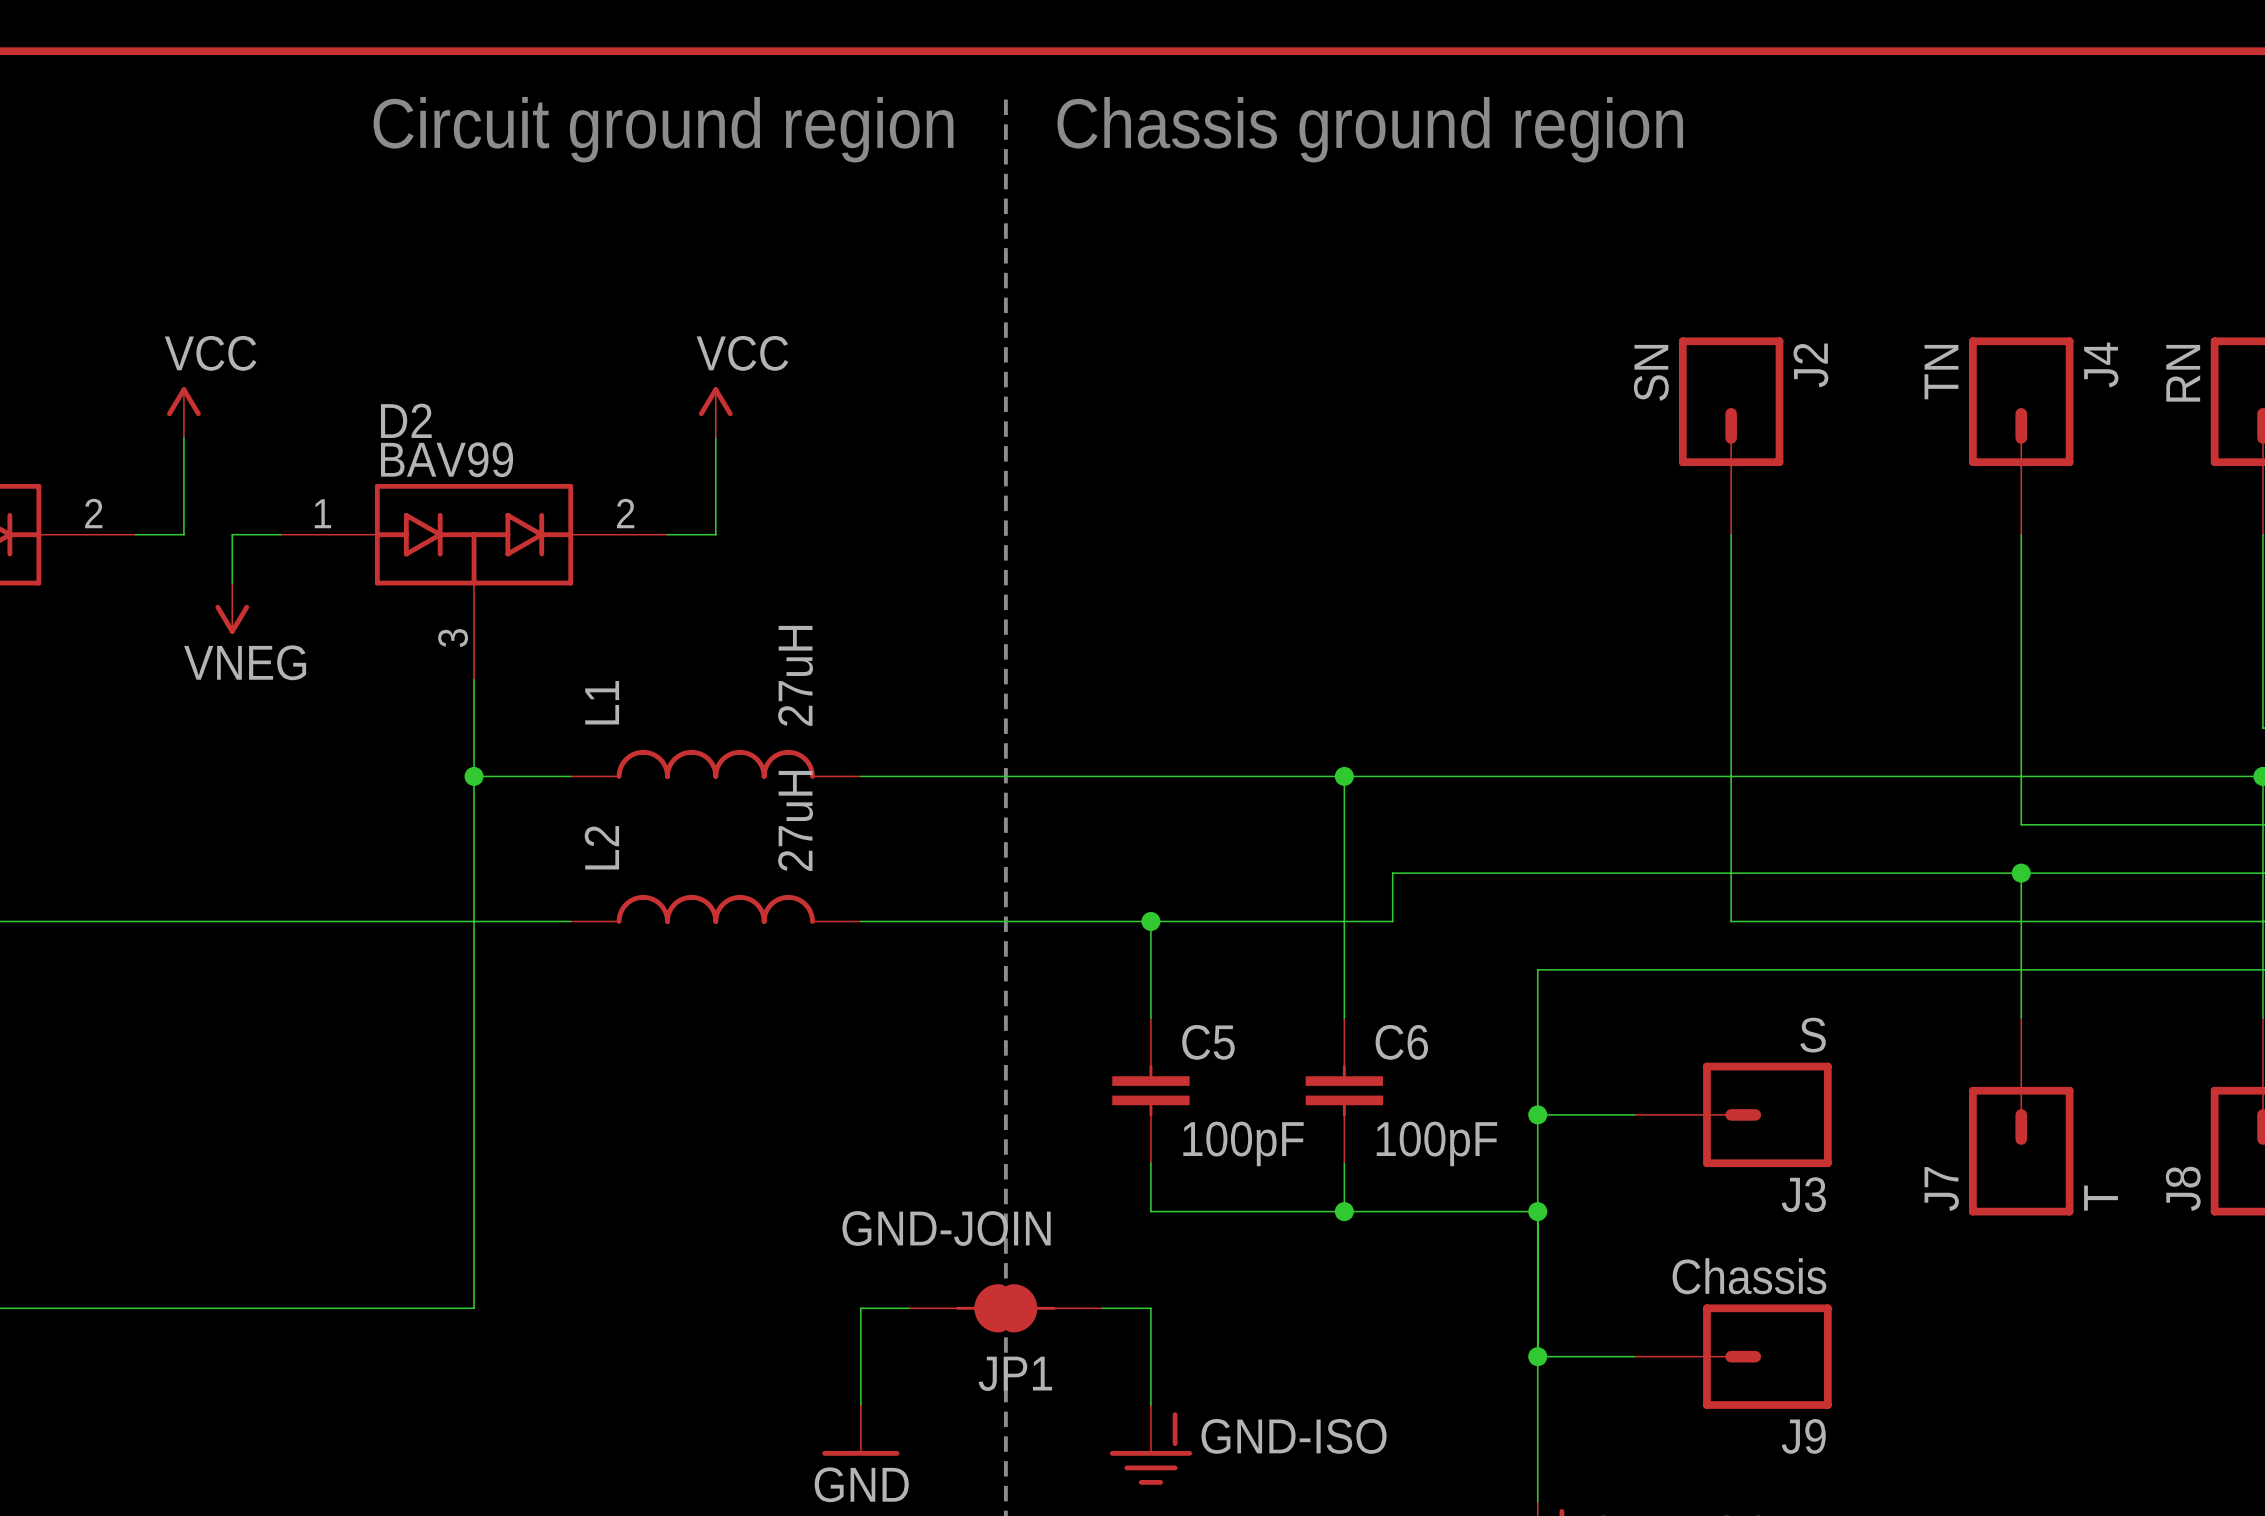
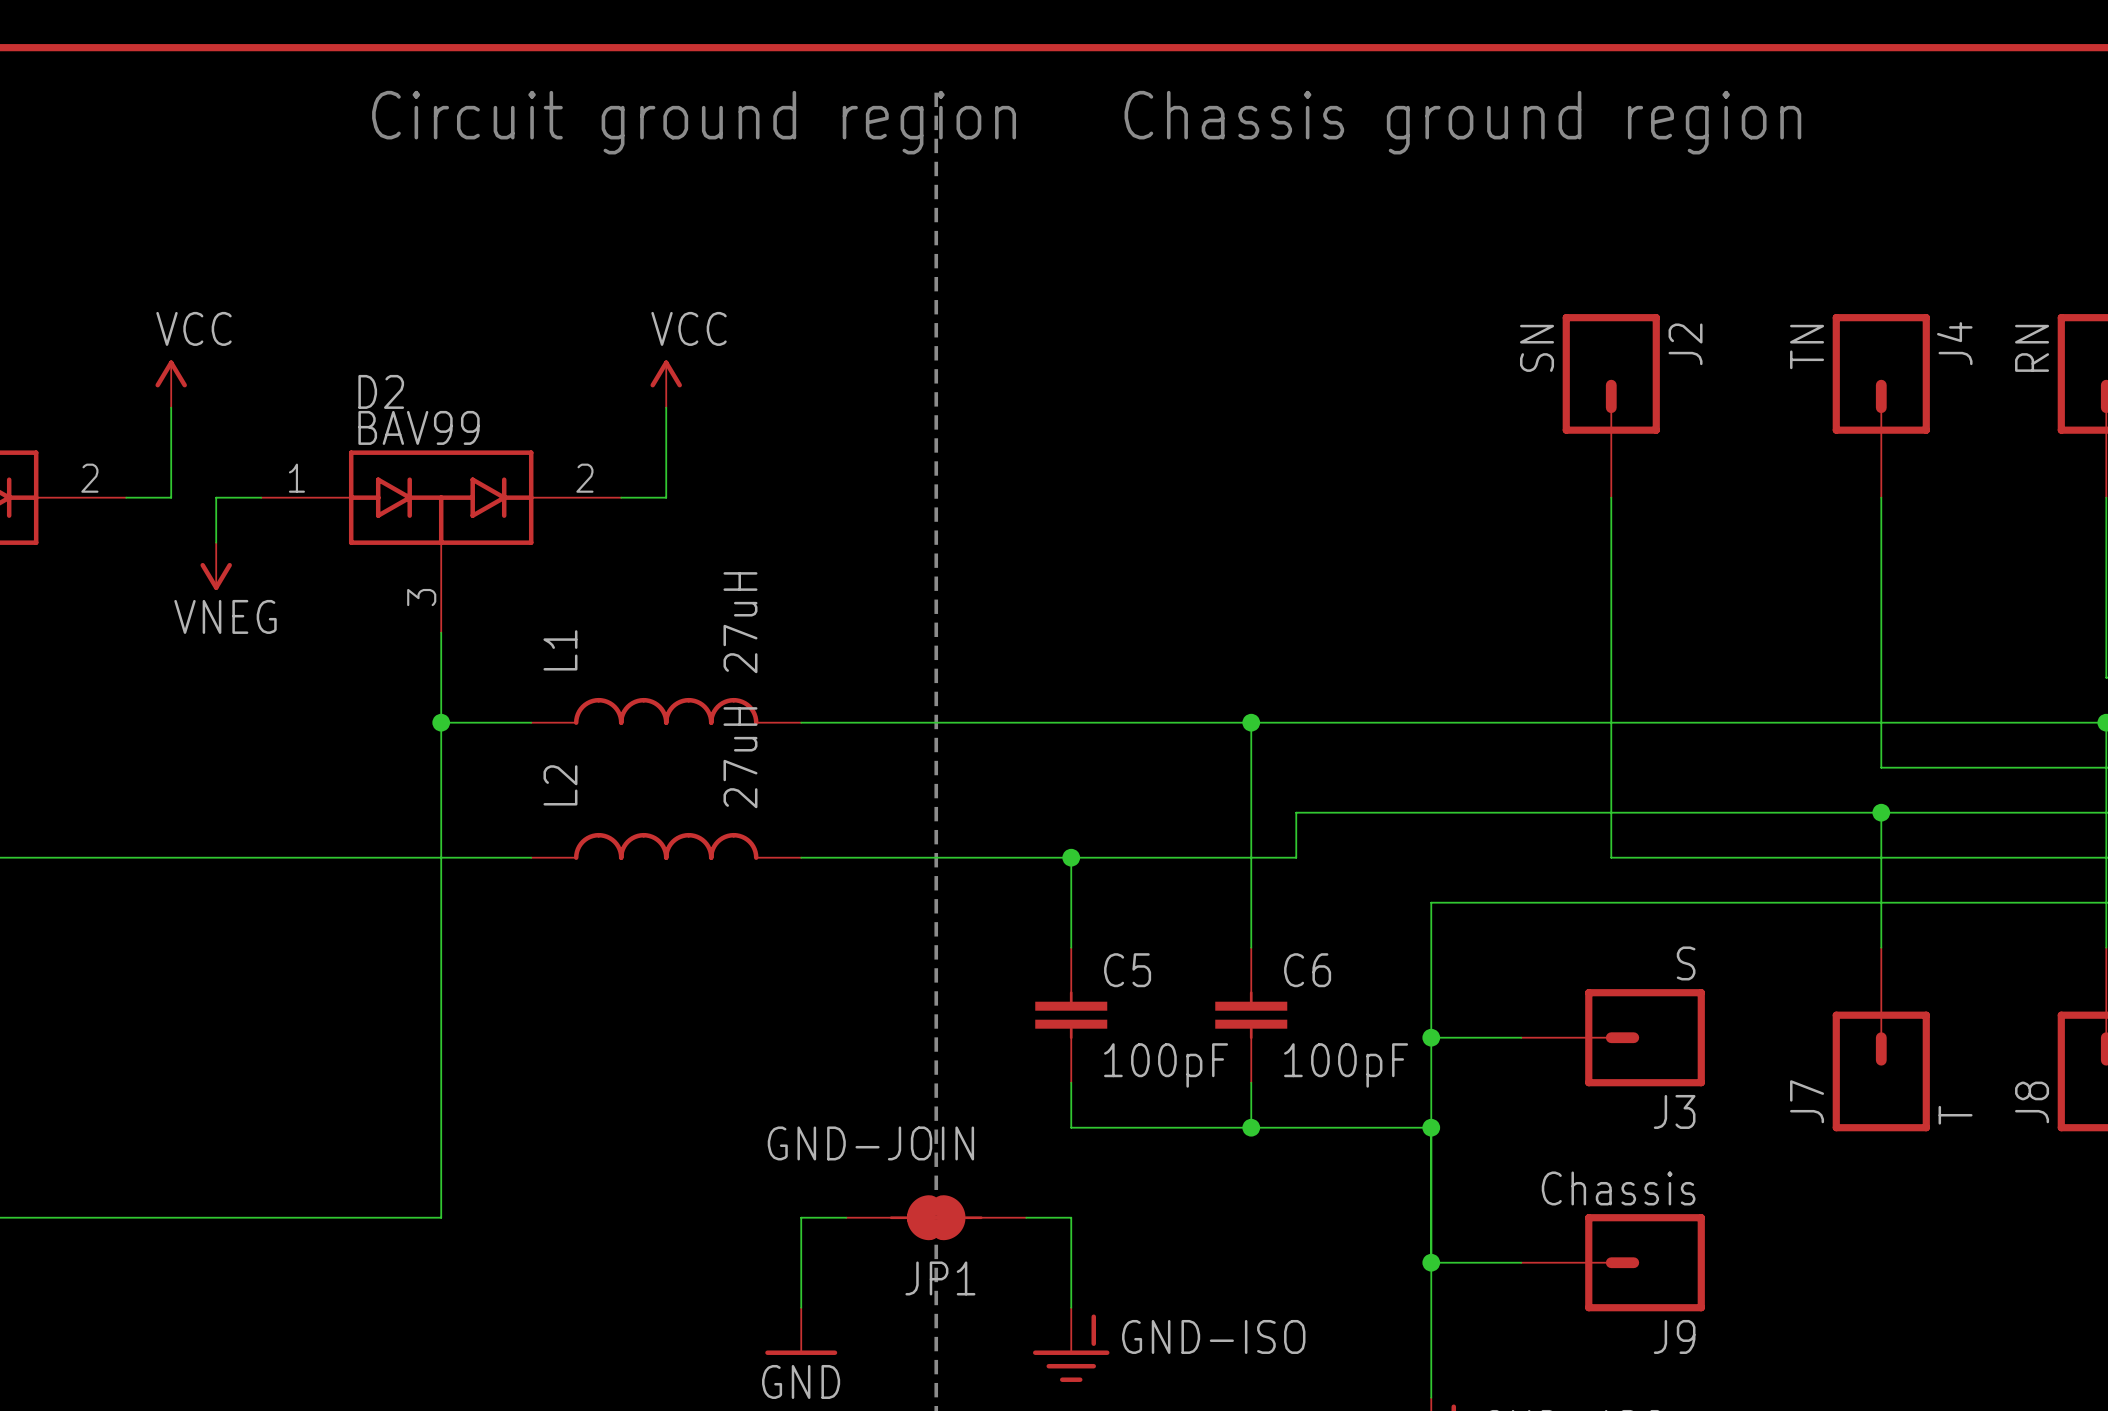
text position: Circuit ground region (663, 129) -> Circuit ground region (694, 122)
text position: Chassis ground region (1370, 129) -> Chassis ground region (1462, 122)

